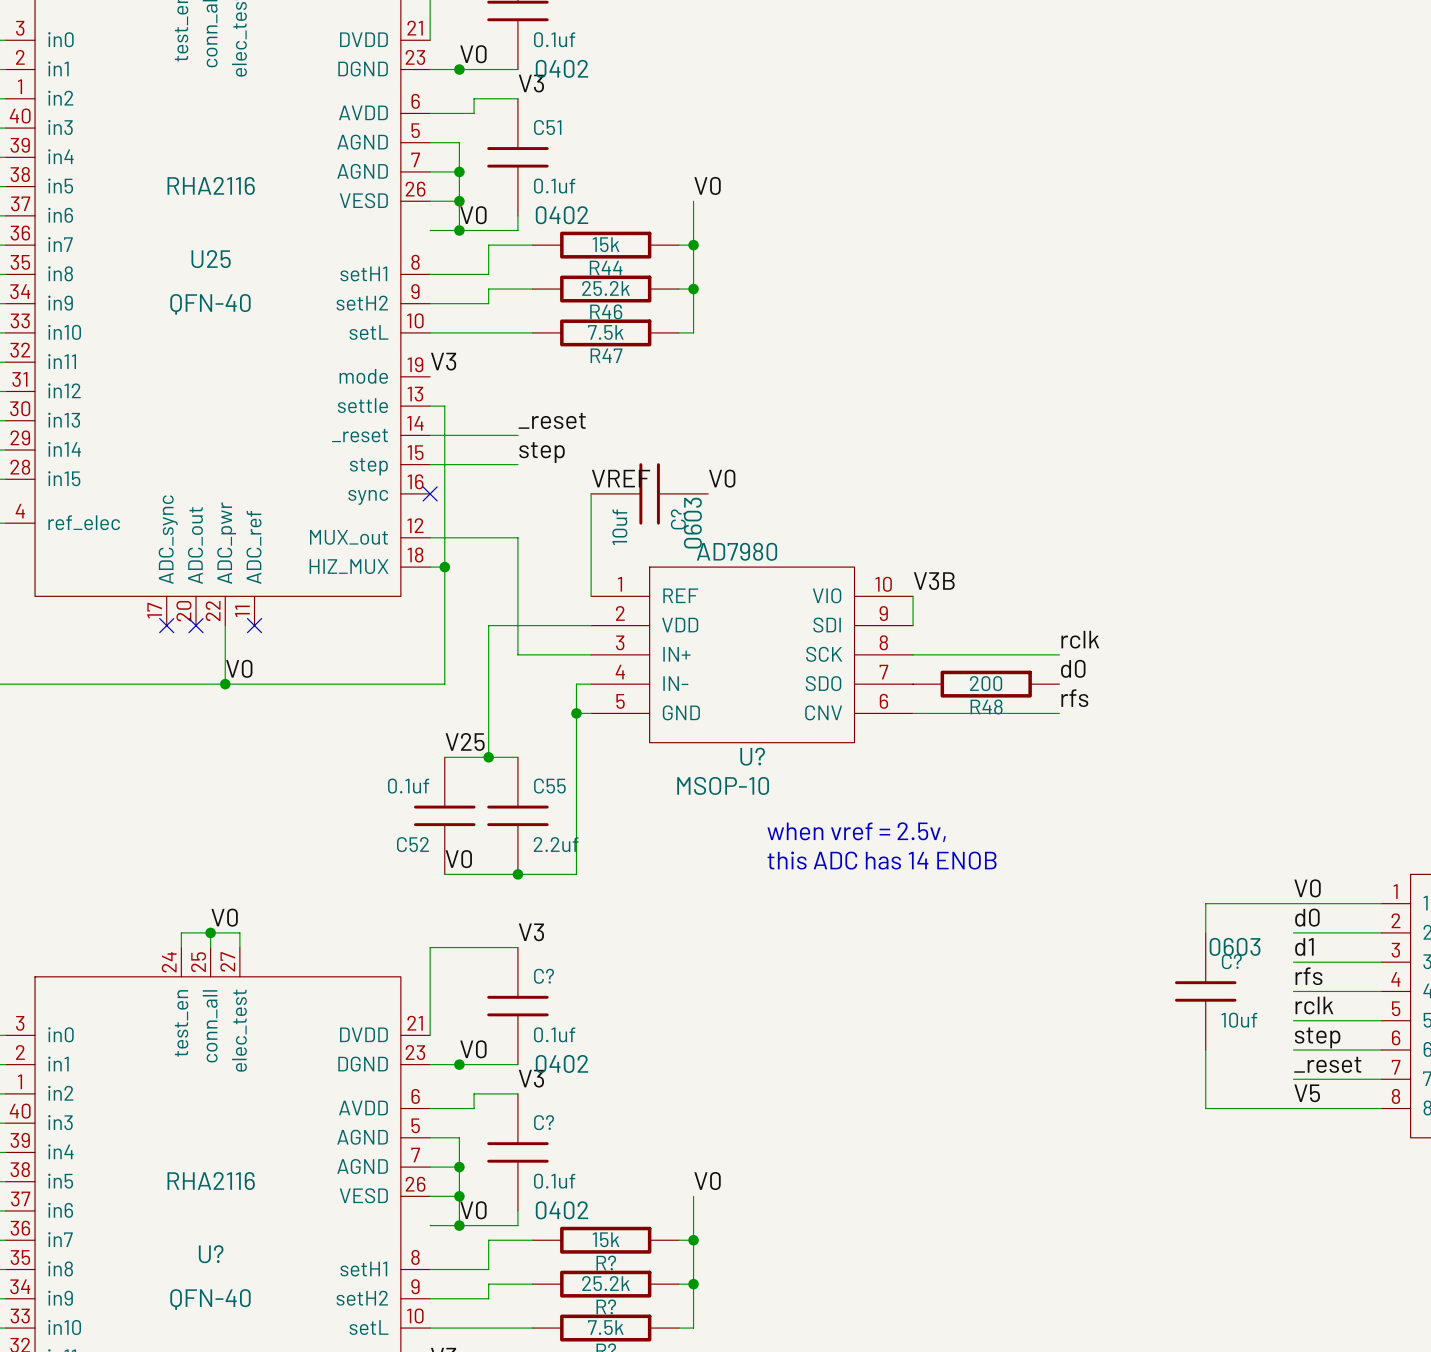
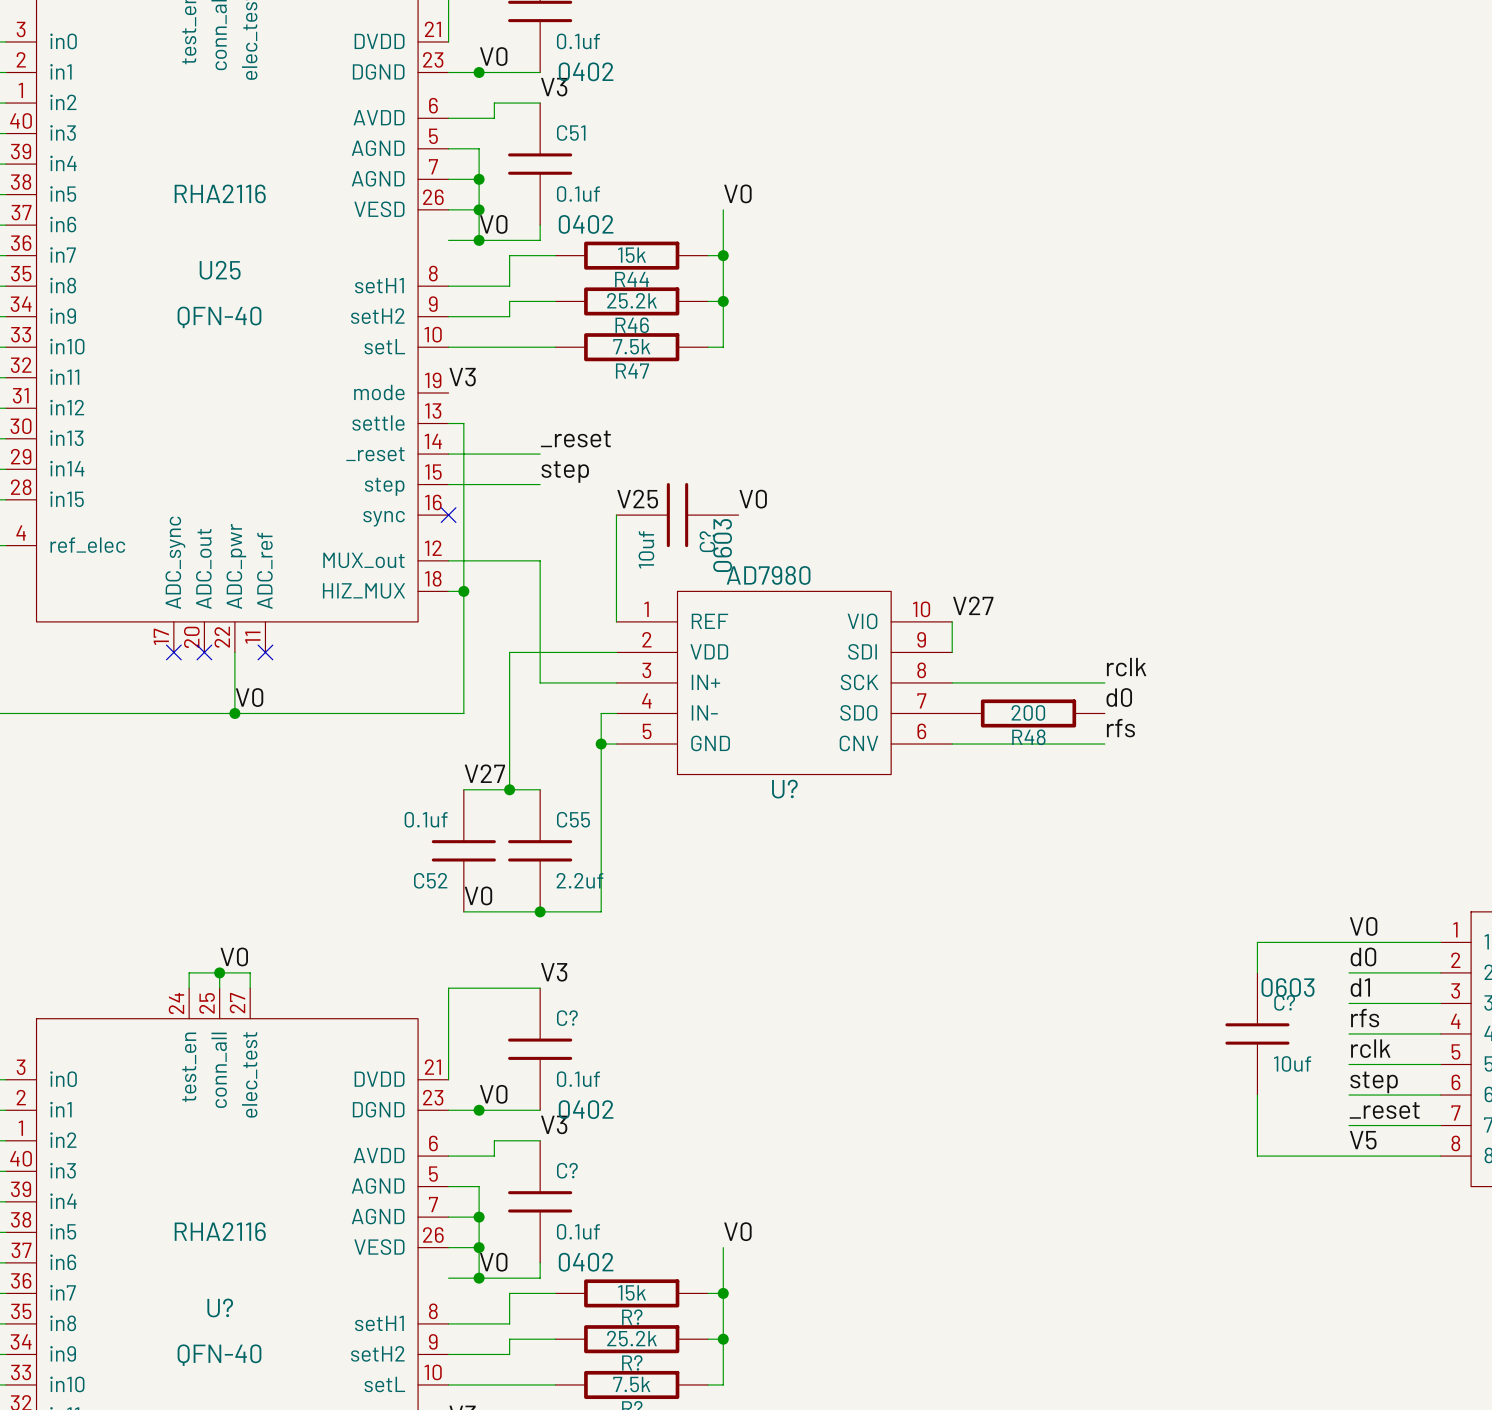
label: VREF (621, 478) -> V25 (637, 499)
label: V3B (934, 581) -> V27 (973, 605)
label: V25 (465, 741) -> V27 (484, 773)
U? text: MSOP-10 (723, 785) -> none
text: when vref = 2.5v, (856, 832) -> none
text: this ADC has 14 ENOB (882, 860) -> none

